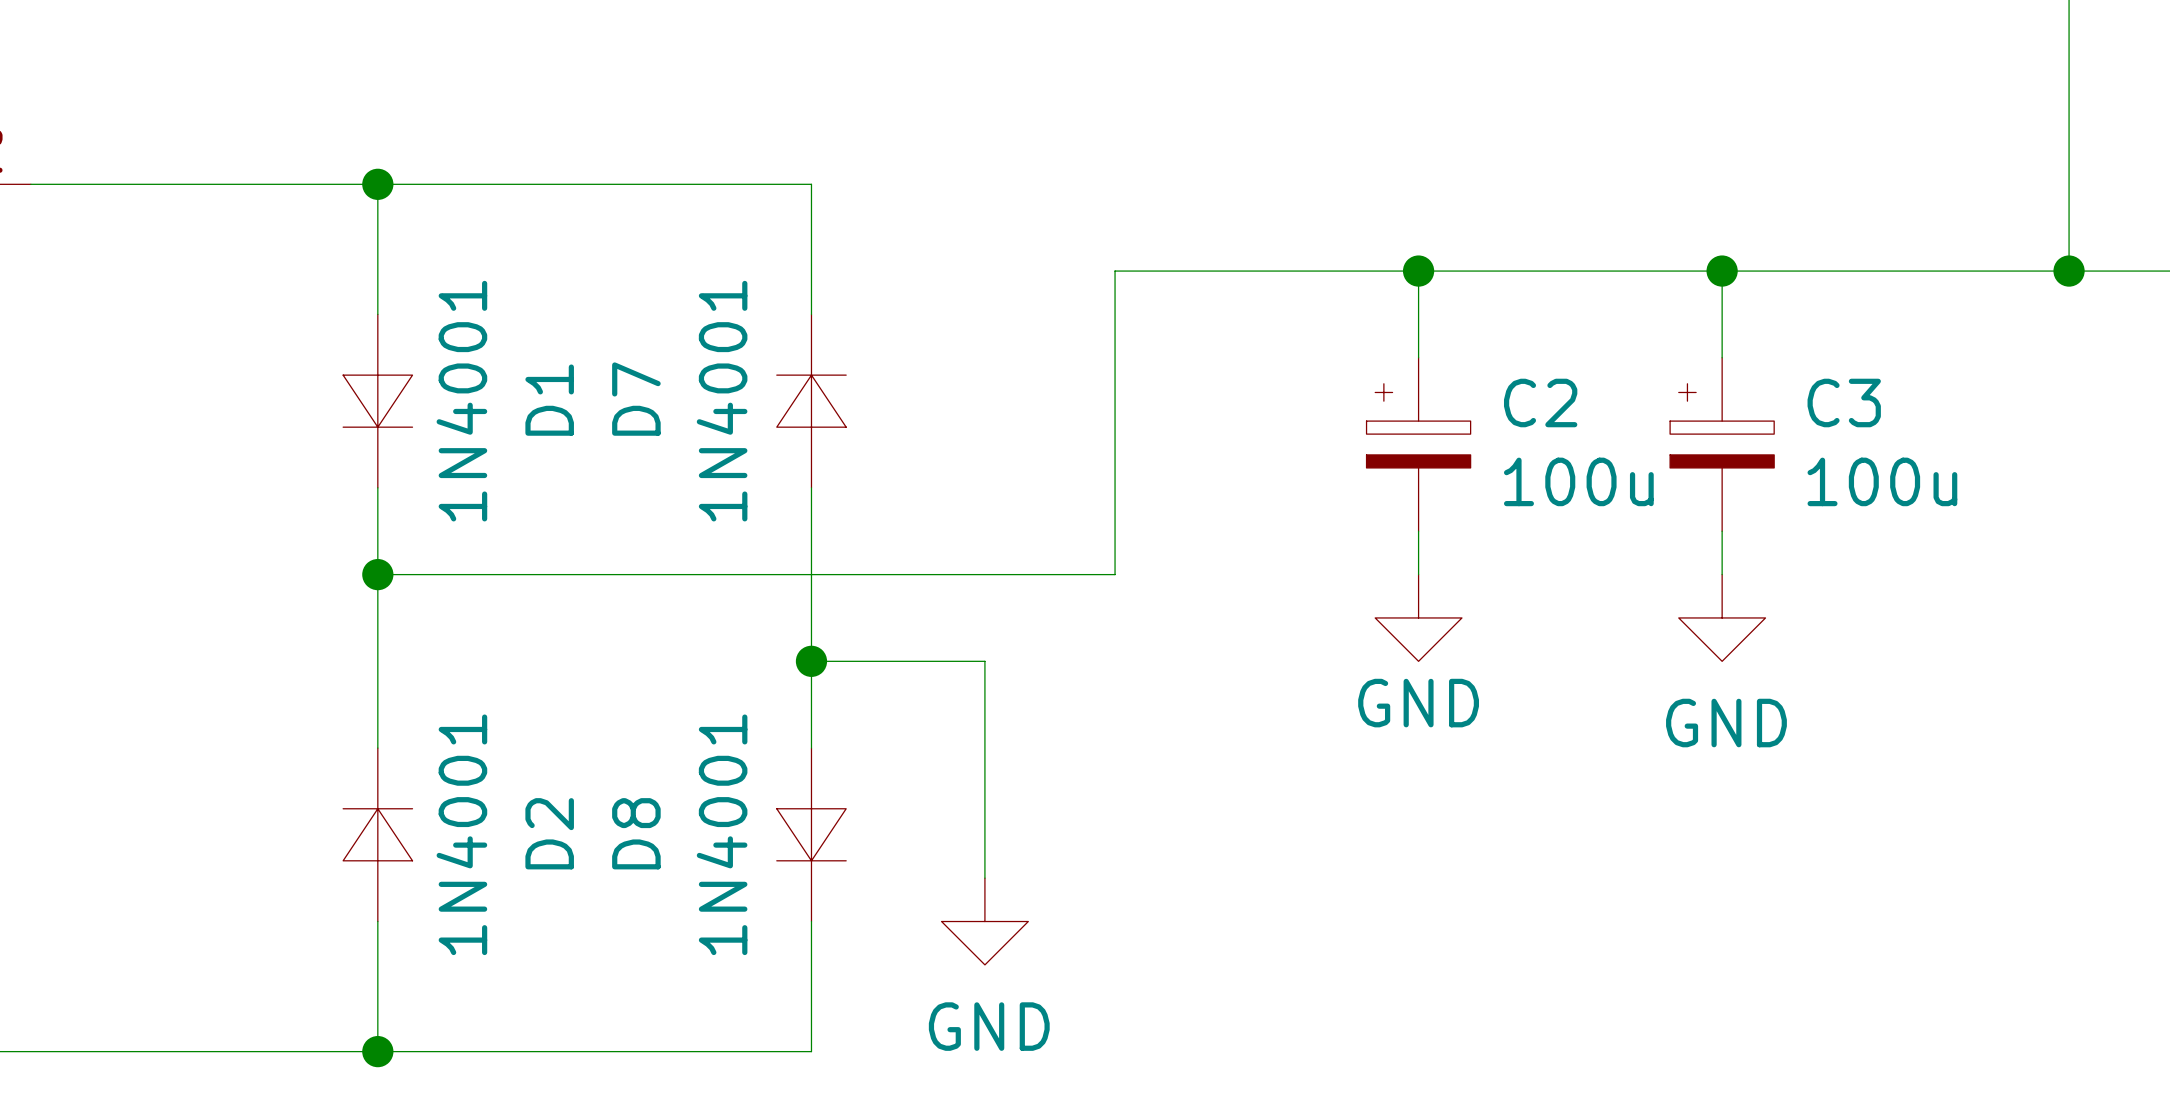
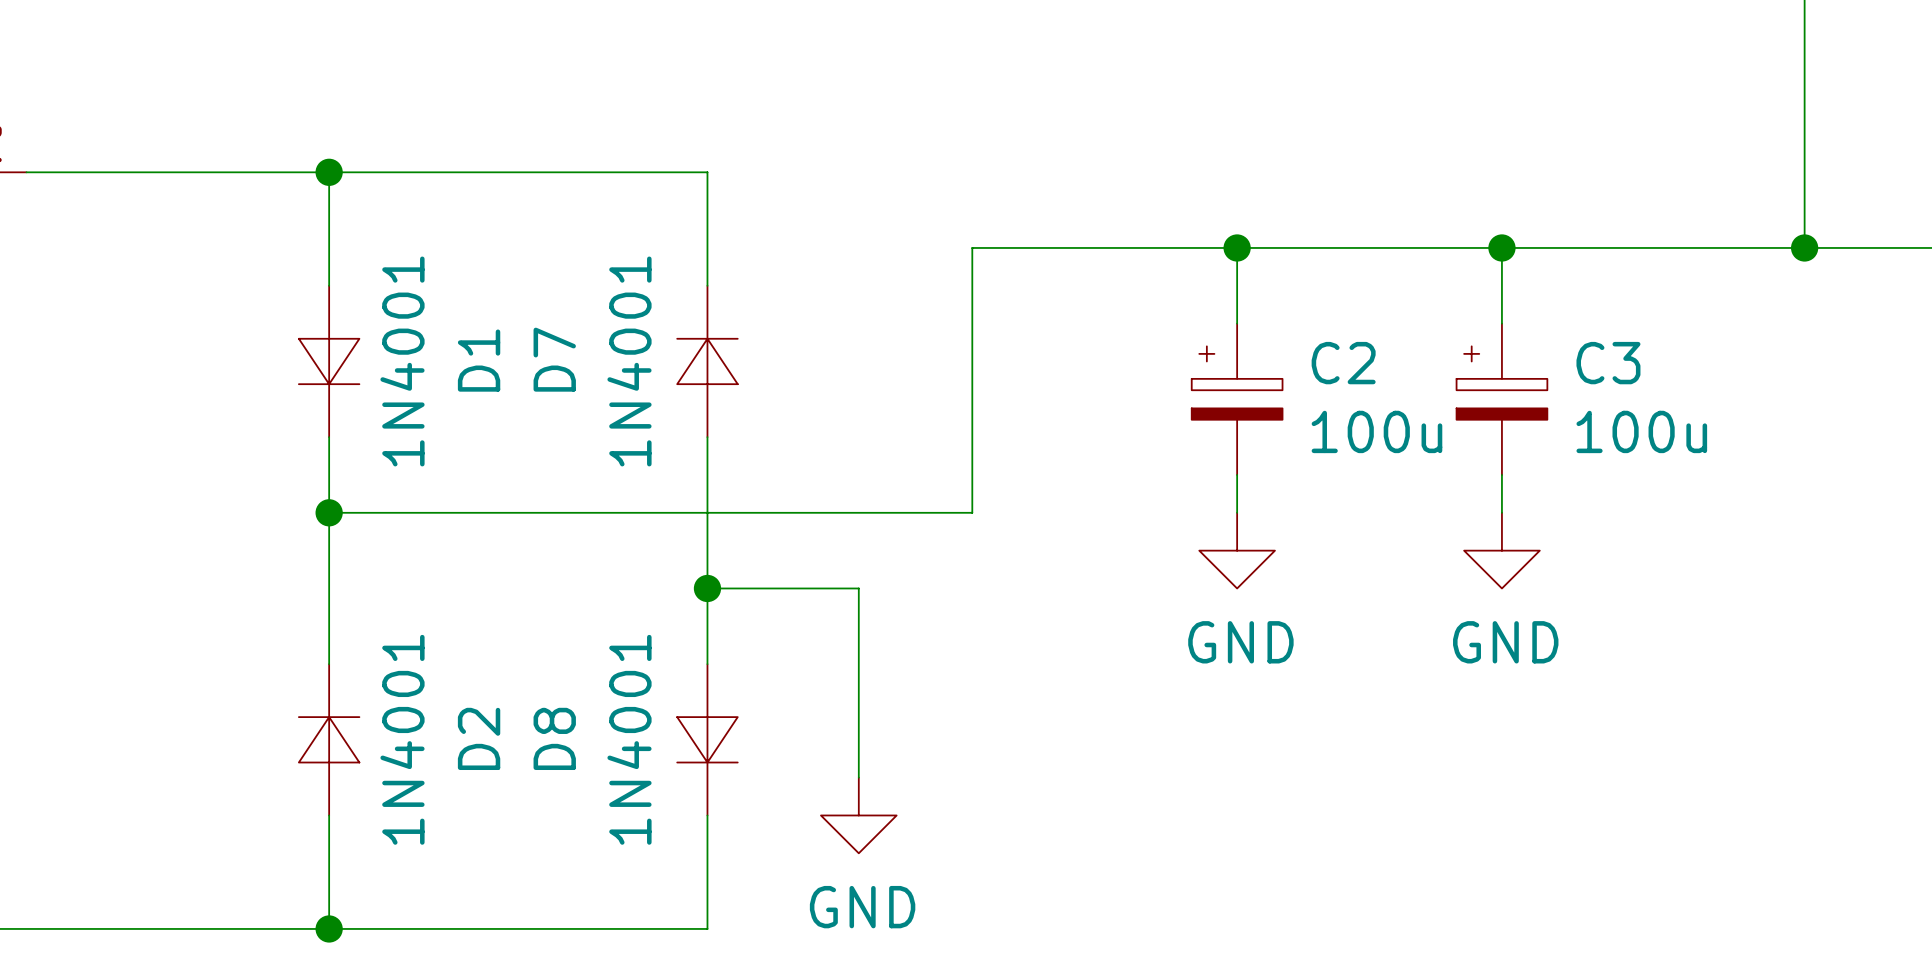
power symbol text position: GND (1418, 703) -> GND (1240, 642)

